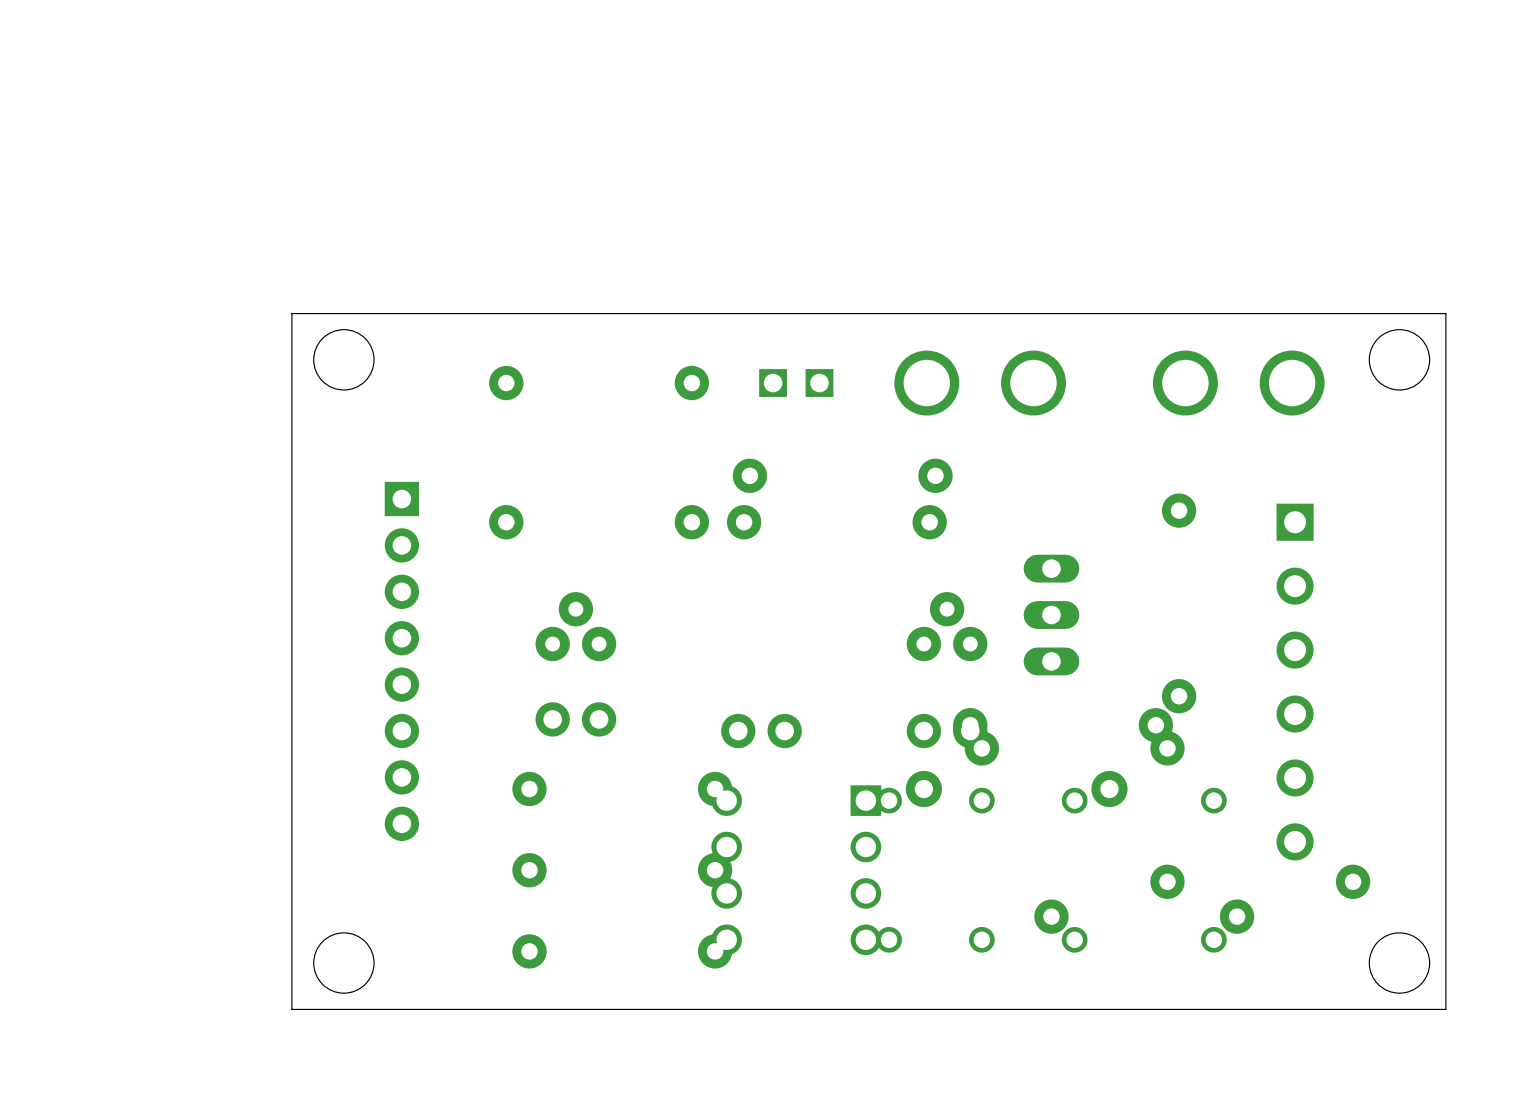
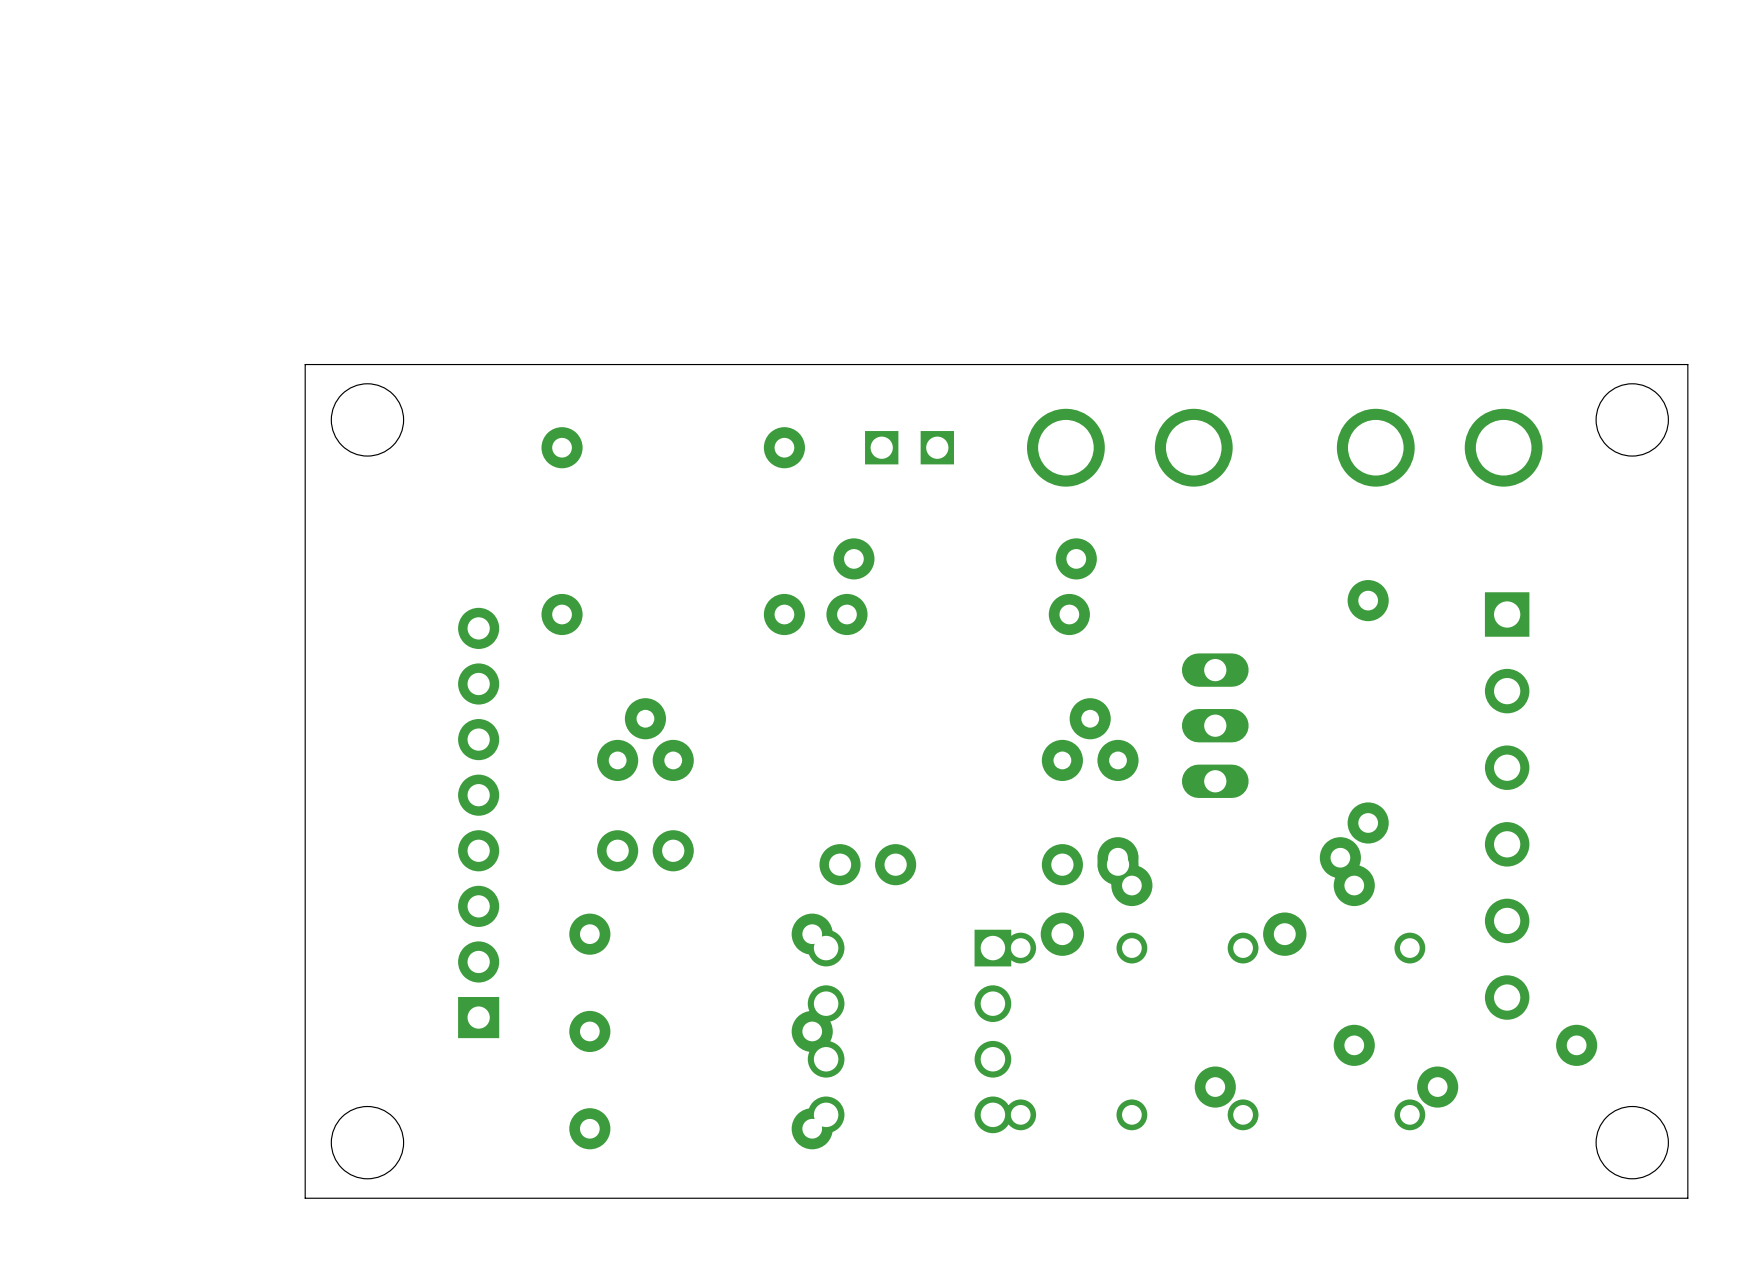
part rotation: 0° (401, 661) -> 180° (478, 822)

